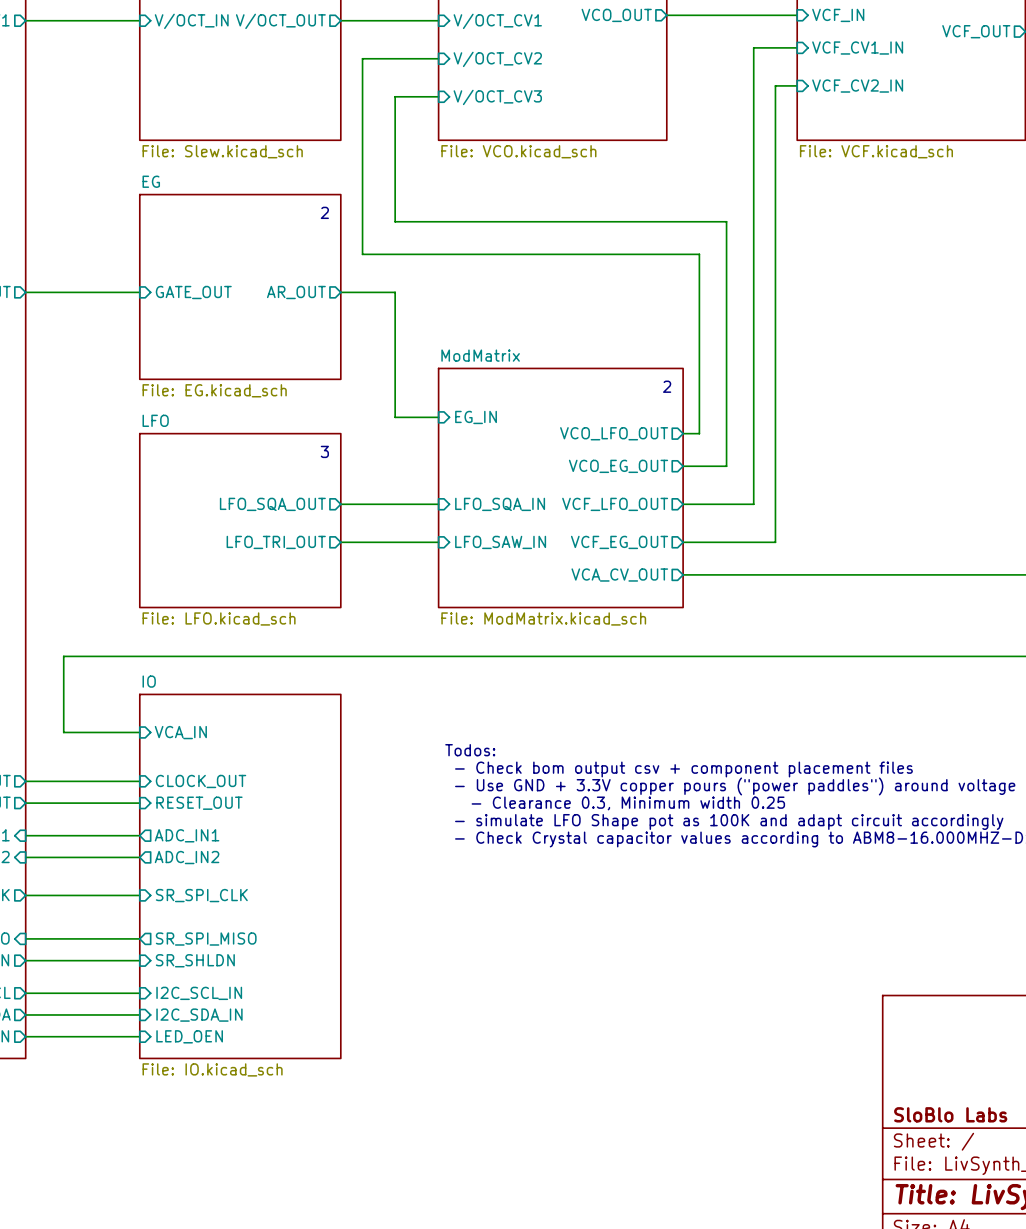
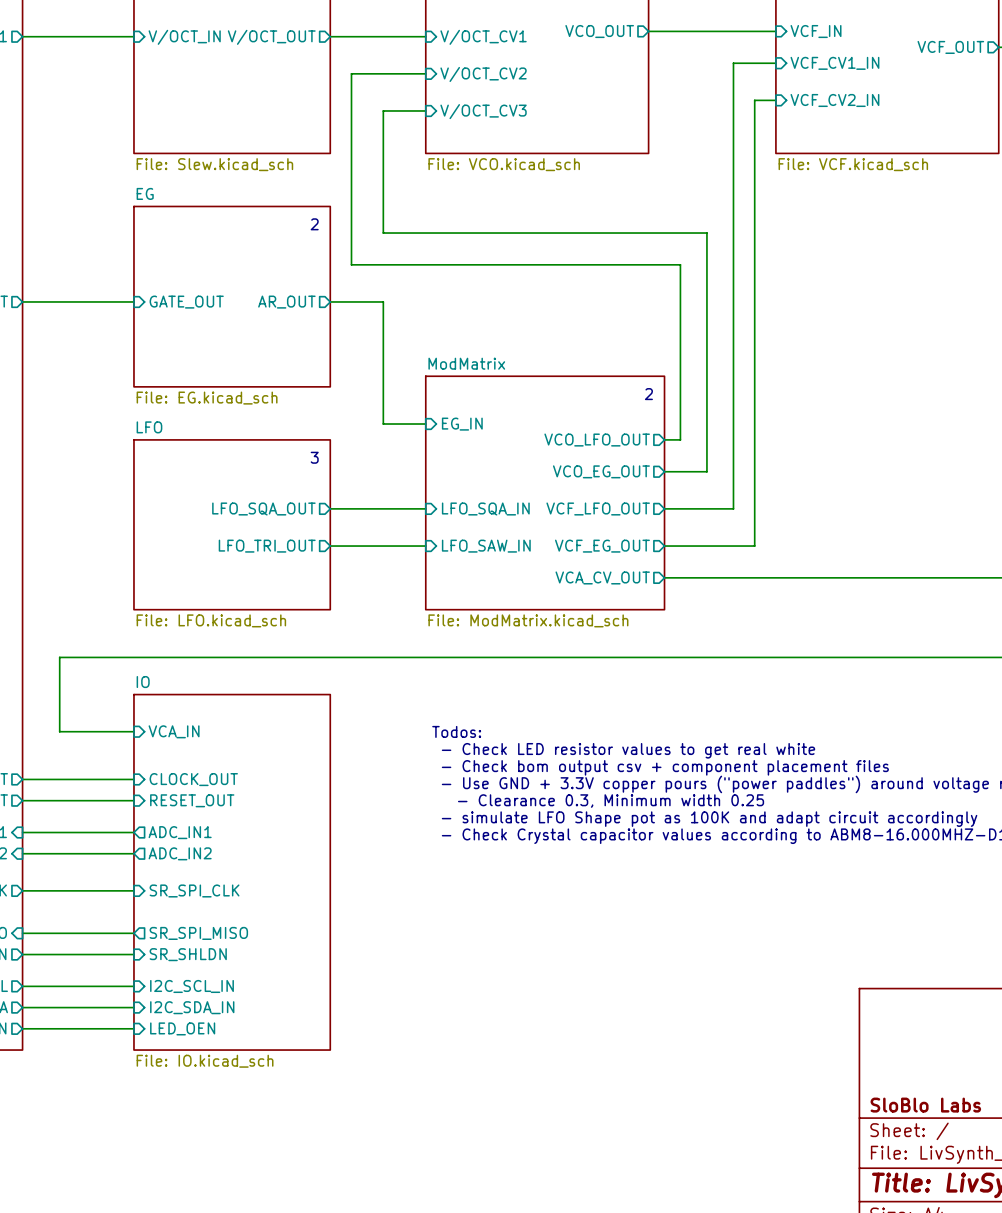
text: none -> Todos: (456, 731)
text: Todos: (470, 750) -> - Check LED resistor values to get real white (628, 750)

